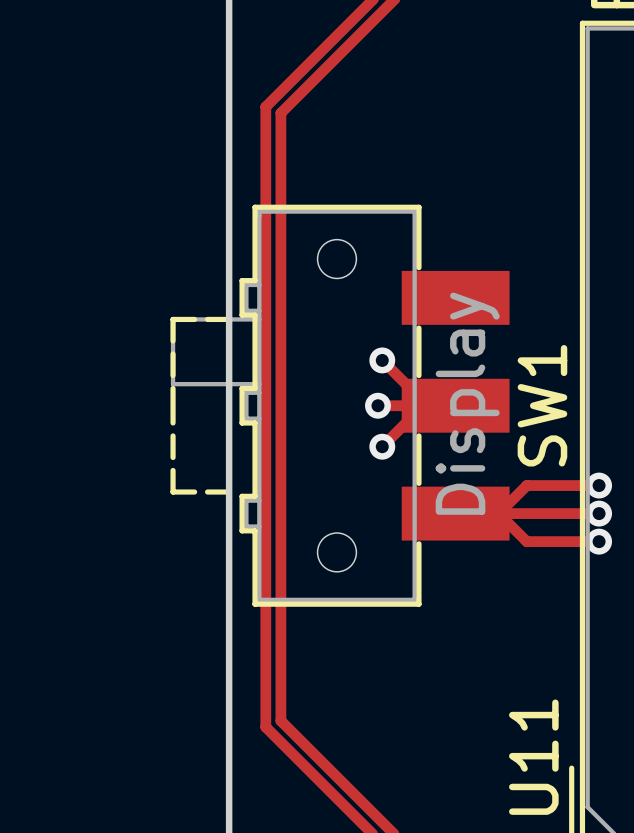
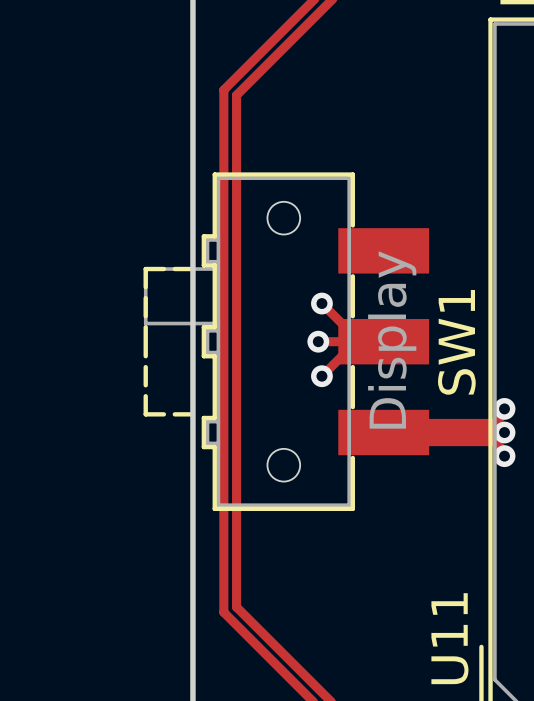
track: (599, 485) (526, 485) (509, 502) -> (509, 408) (494, 423) (429, 423)
track: (509, 524) (526, 541) (599, 541) -> (429, 441) (494, 441) (509, 456)

